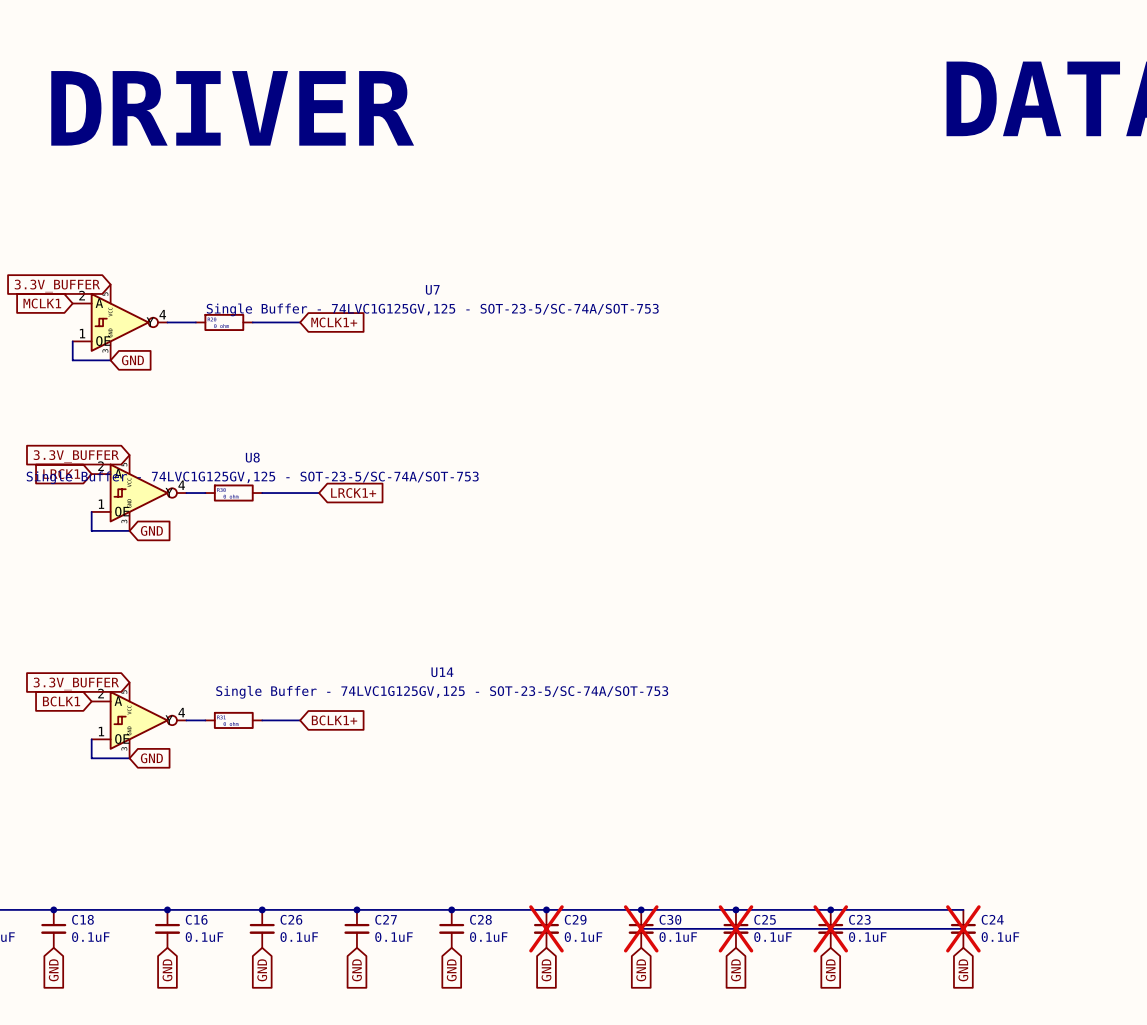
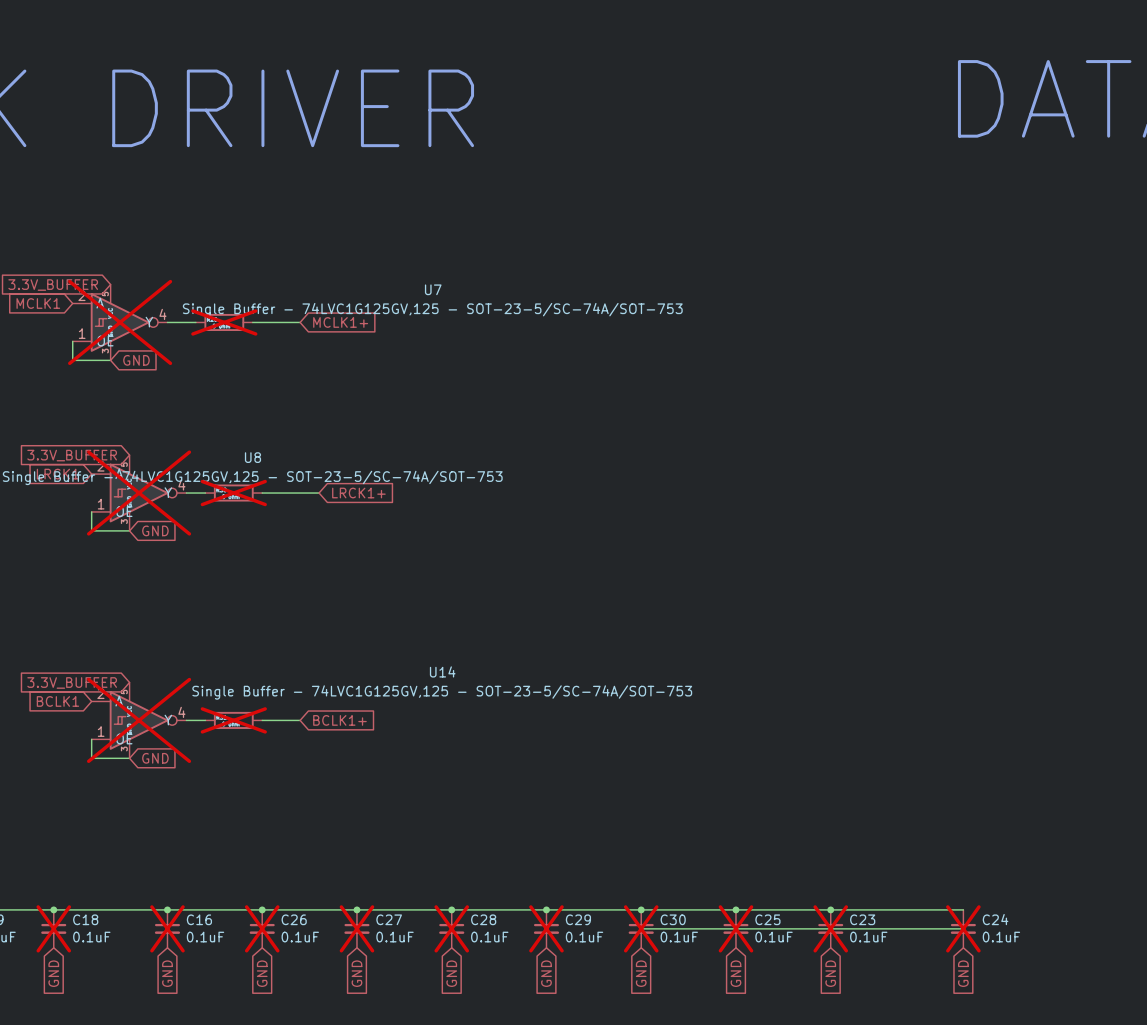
U7 do-not-place cross: none -> (120, 322)
part do-not-place cross: none -> (224, 322)
U8 do-not-place cross: none -> (139, 493)
part do-not-place cross: none -> (233, 493)
U14 do-not-place cross: none -> (139, 720)
part do-not-place cross: none -> (233, 720)
C18 do-not-place cross: none -> (53, 928)
C16 do-not-place cross: none -> (167, 928)
C26 do-not-place cross: none -> (262, 928)
C27 do-not-place cross: none -> (356, 928)
C28 do-not-place cross: none -> (451, 928)

